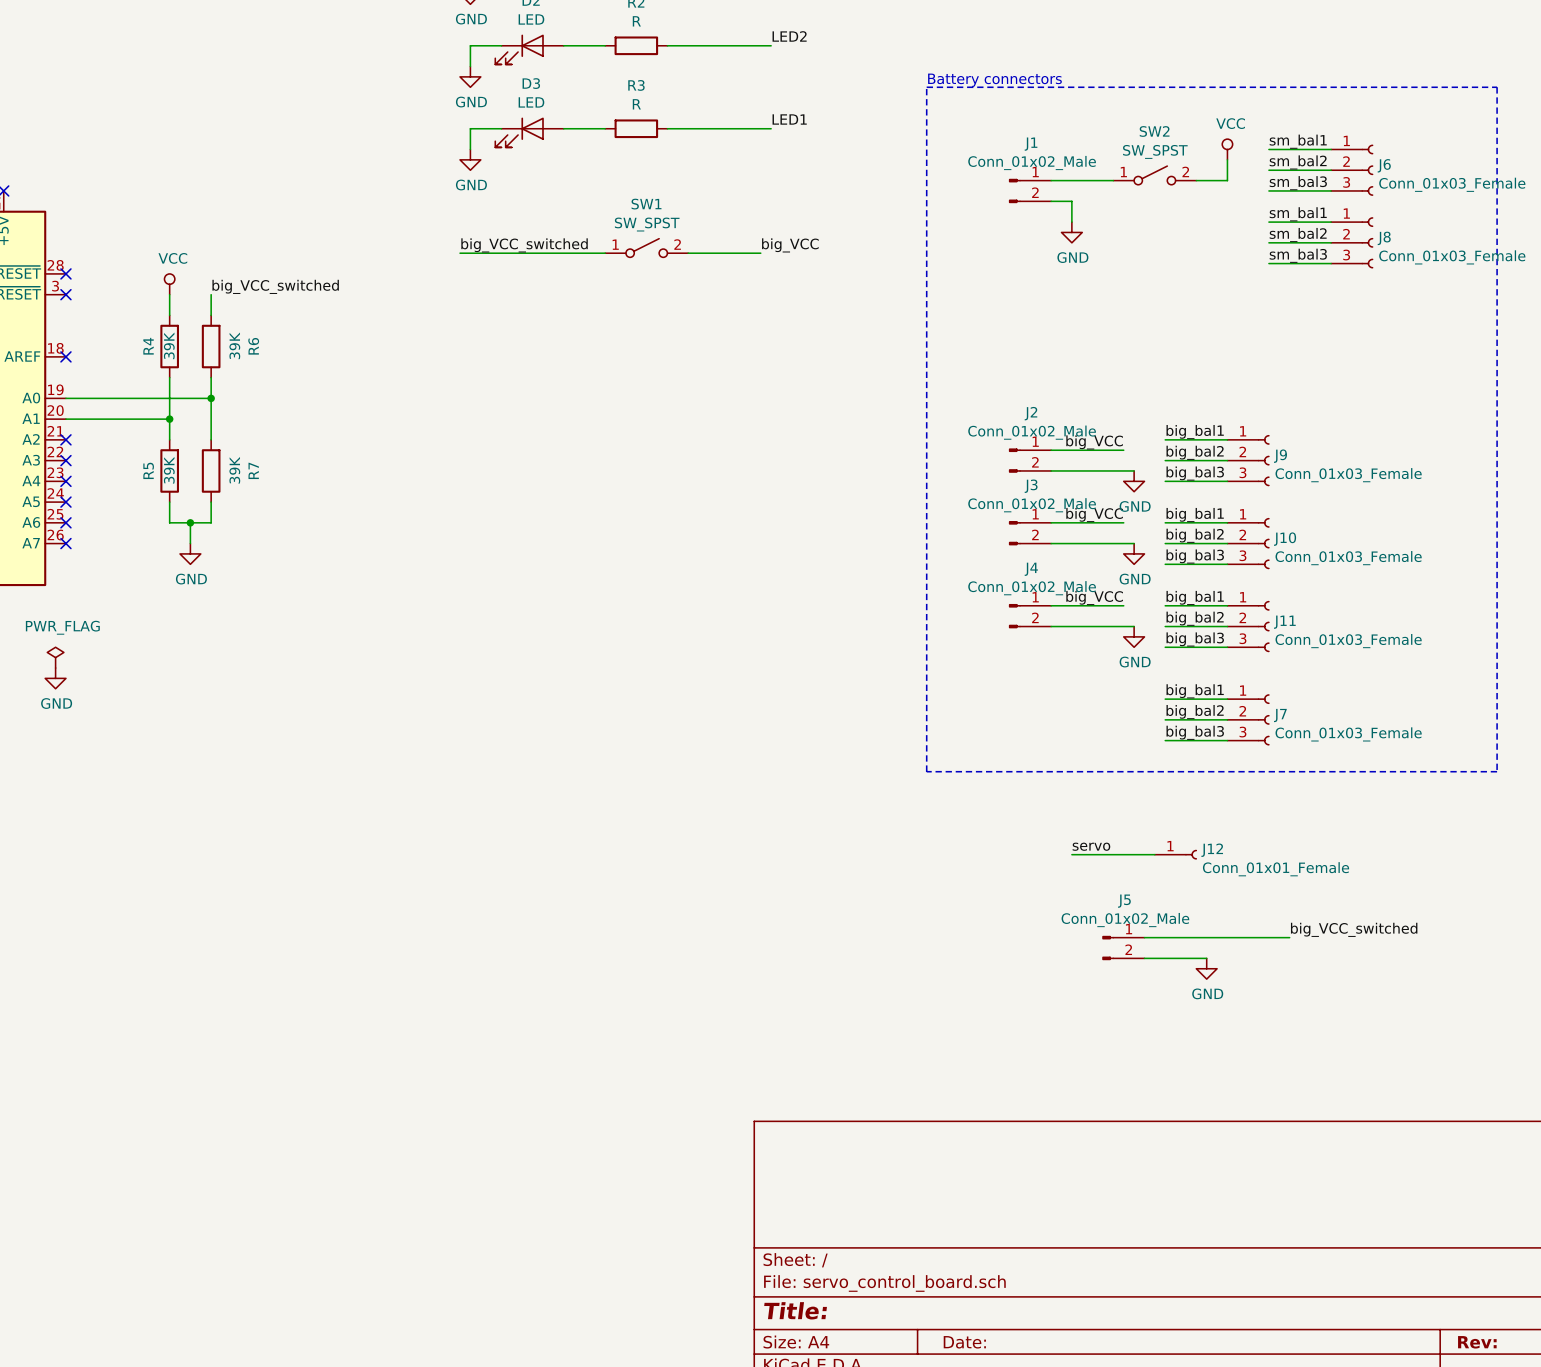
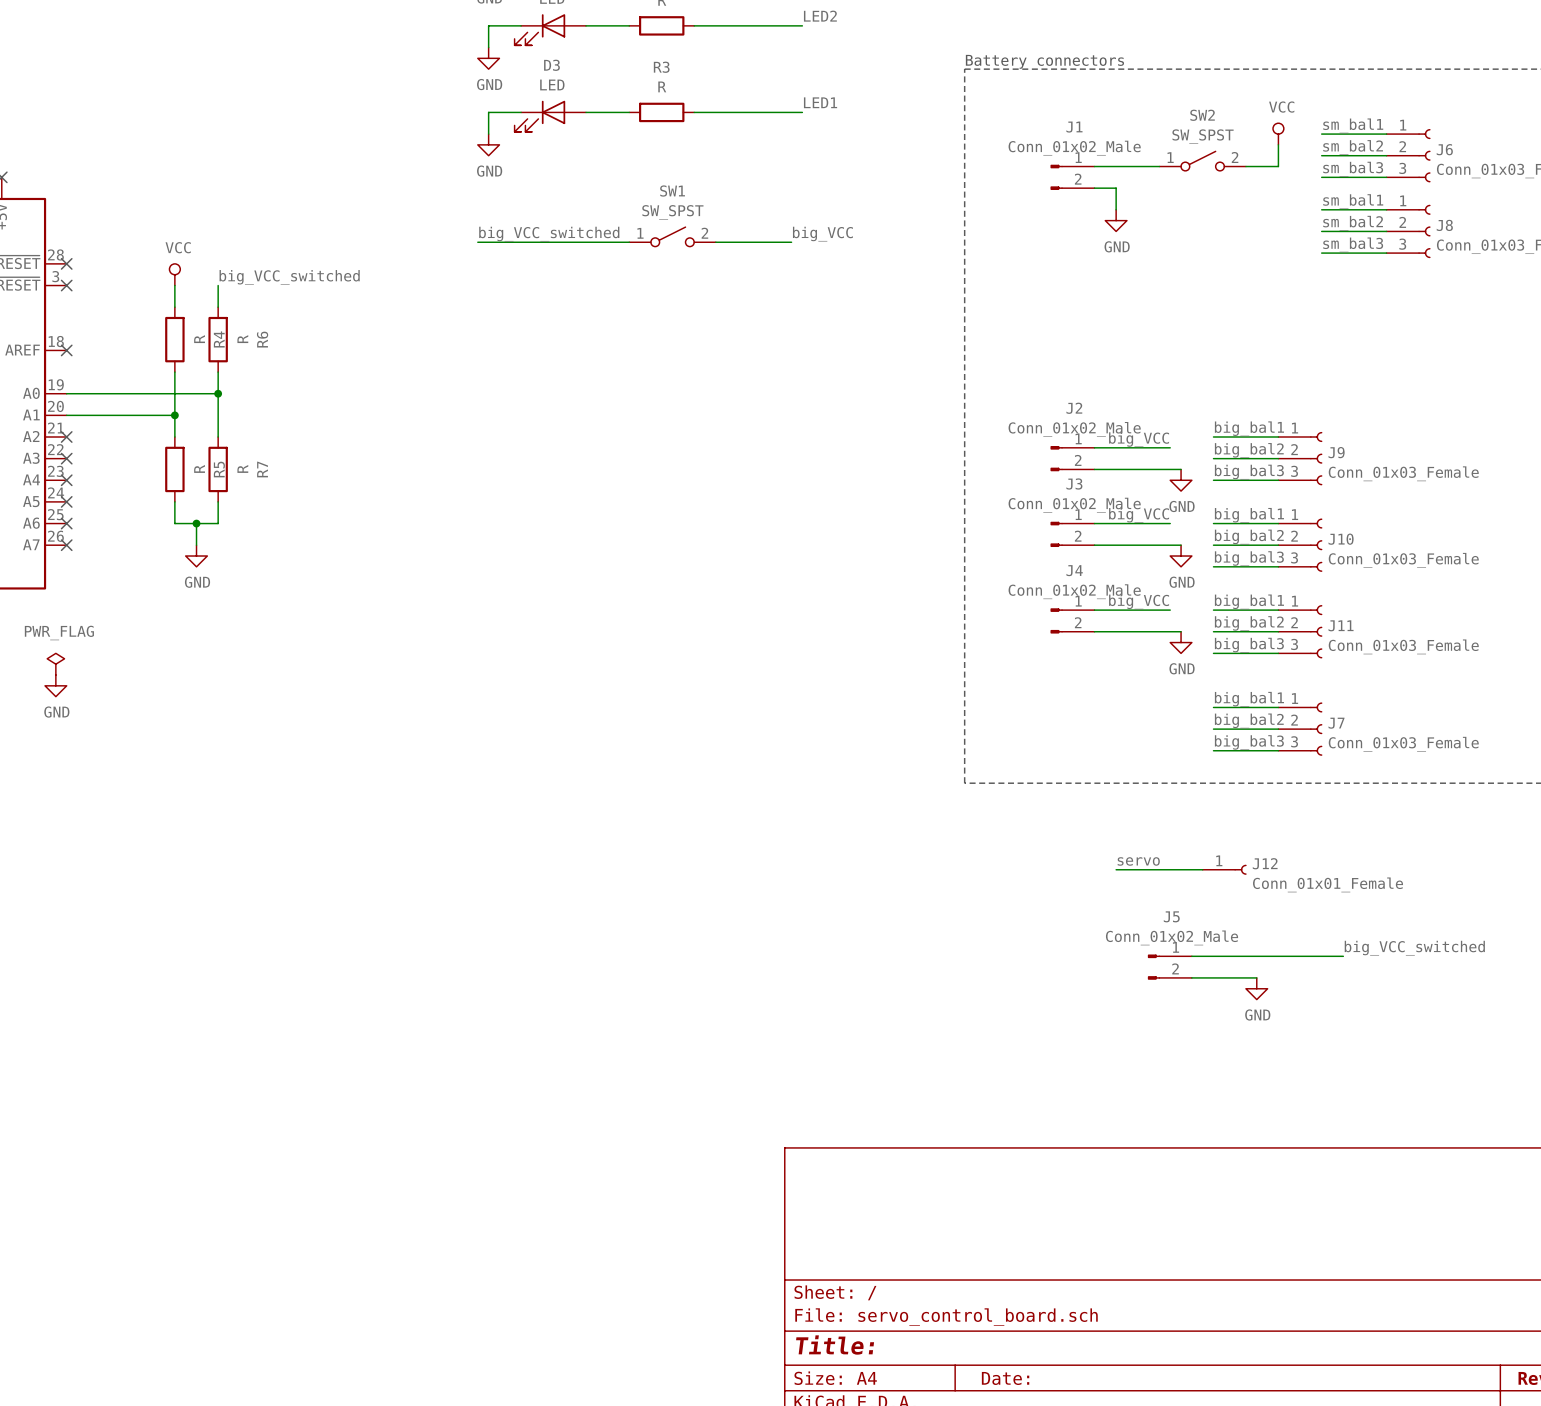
R4 value: 39K (169, 345) -> R (199, 339)
R6 value: 39K (234, 345) -> R (242, 339)
R4 name position: R4 (148, 346) -> R4 (219, 339)
R5 name position: R5 (148, 470) -> R5 (219, 469)
R5 value: 39K (169, 470) -> R (199, 468)
R7 value: 39K (234, 470) -> R (242, 468)

